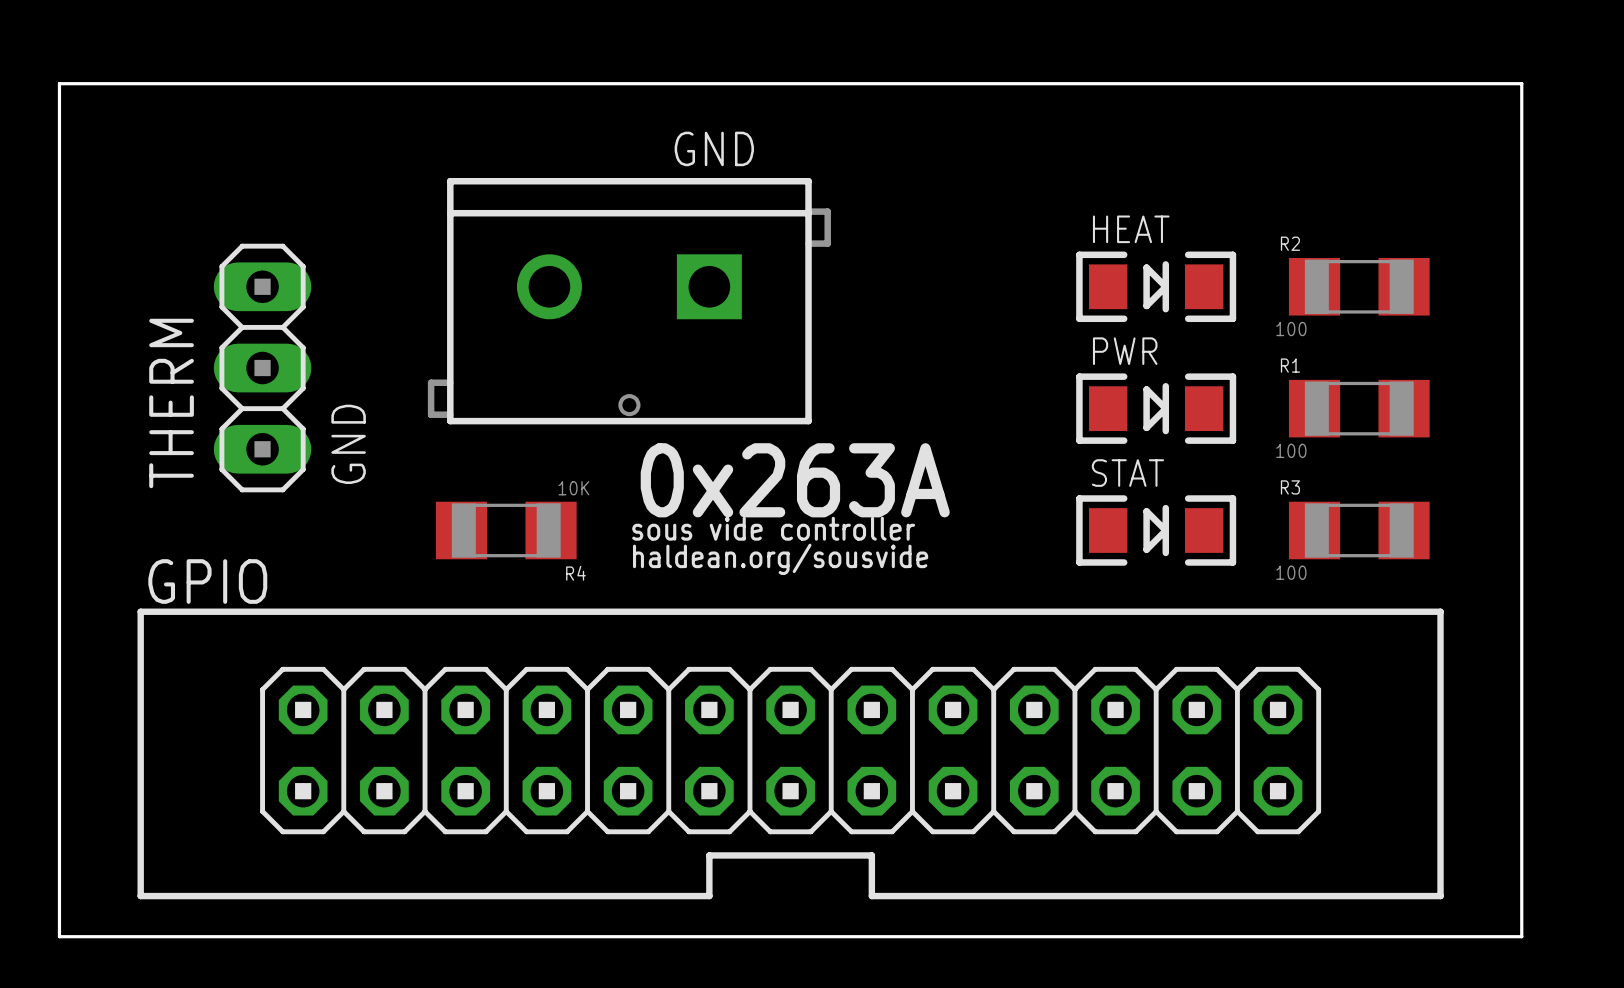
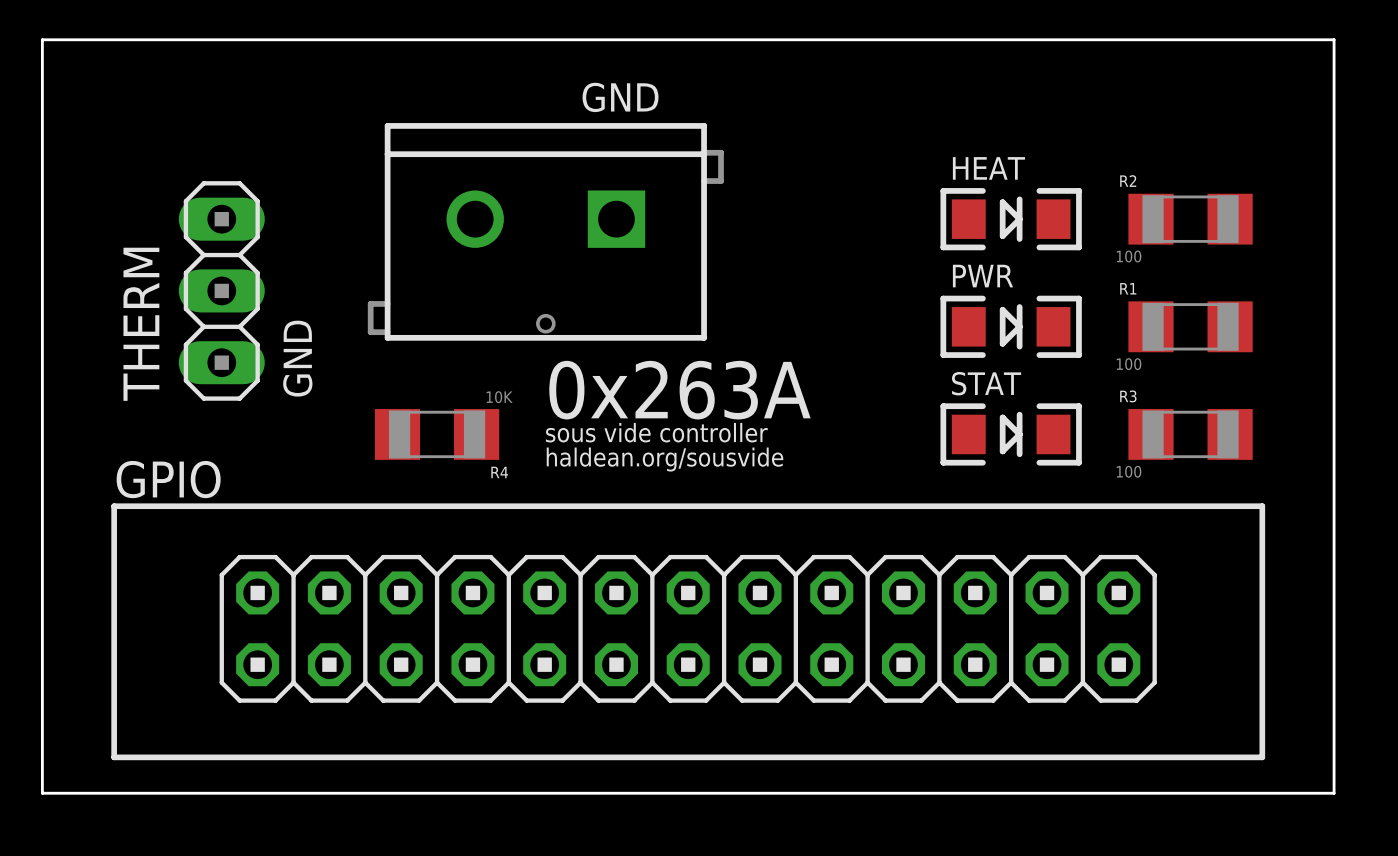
line: (709, 896) (709, 855) (871, 855) (871, 896) -> (616, 757) (759, 757)

